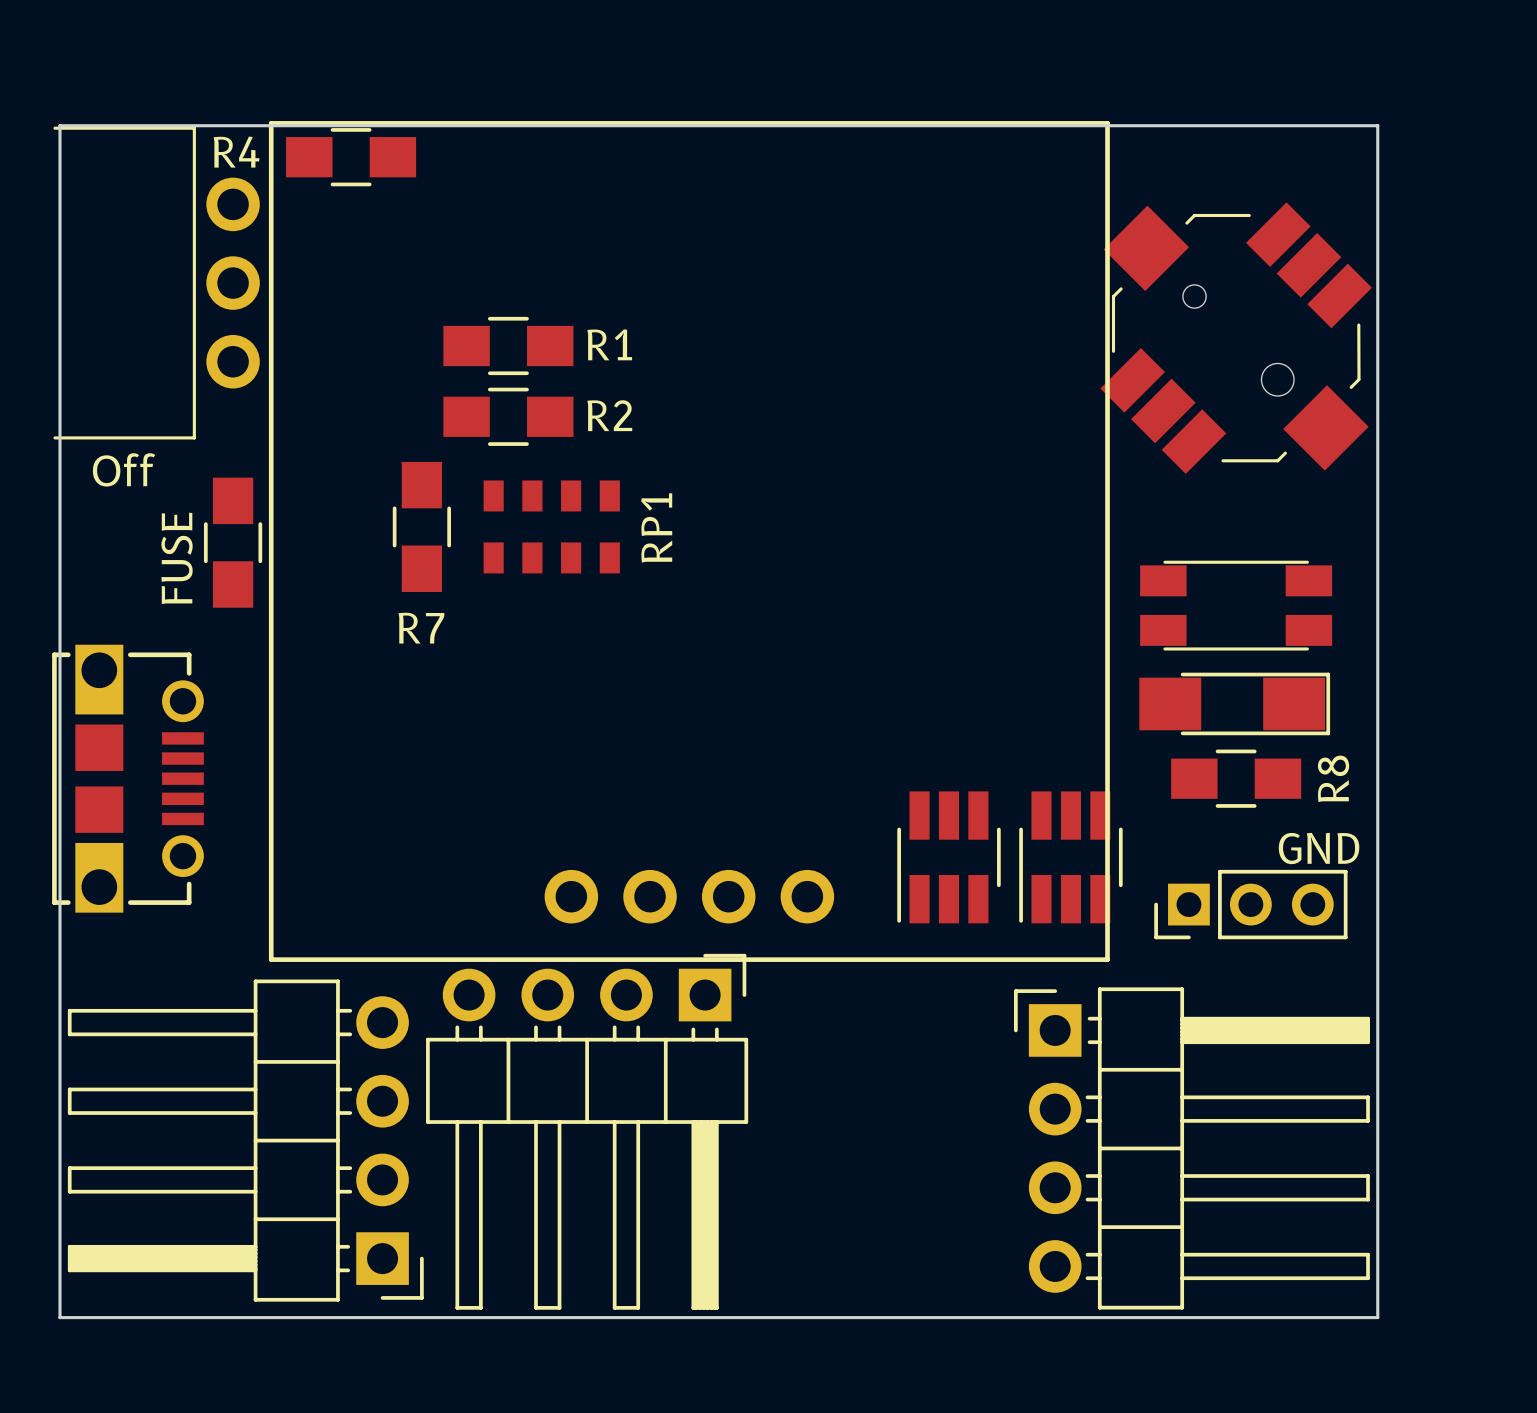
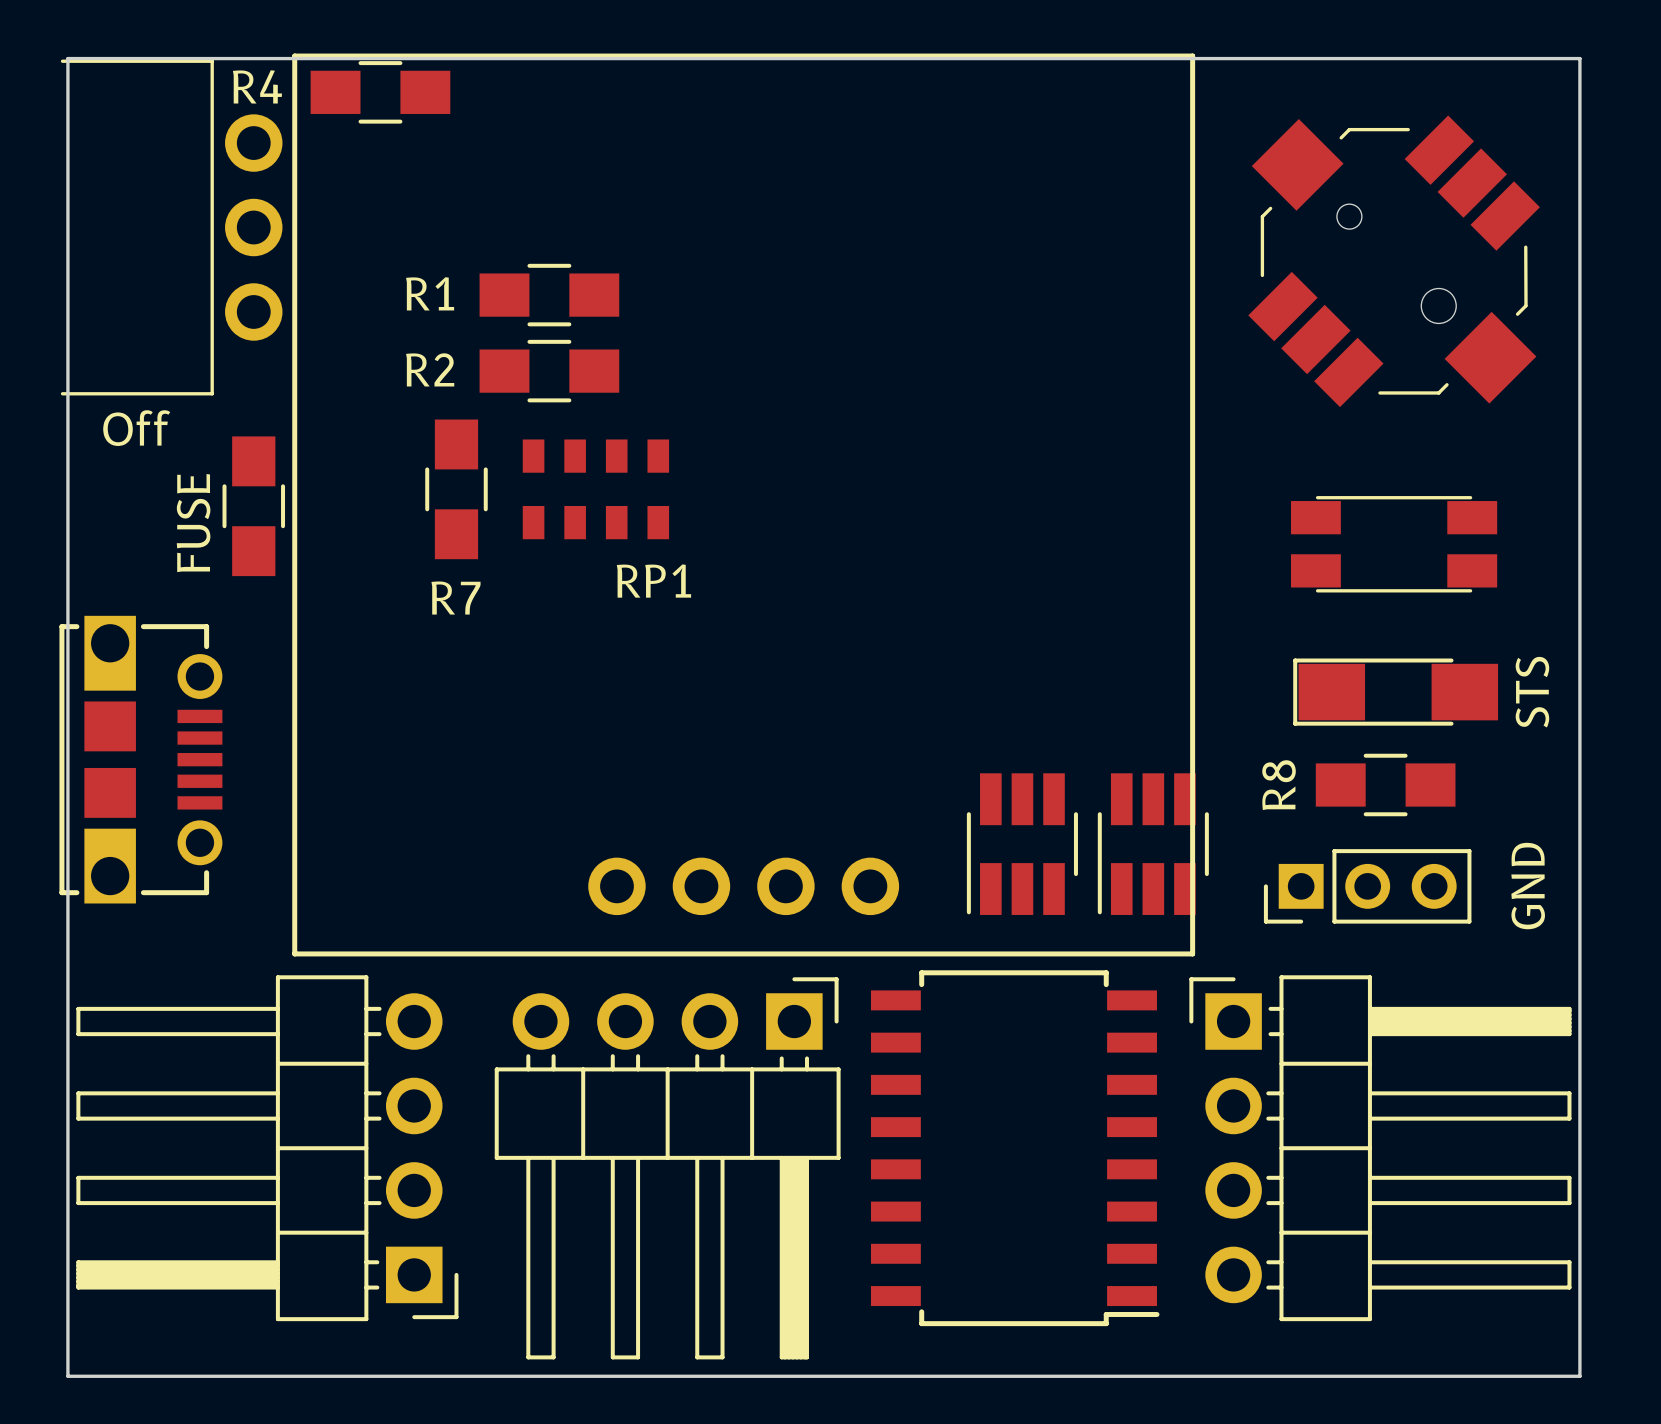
board edge: (1377, 125) (1377, 1317) (60, 1317) -> (1482, 58) (1579, 58) (1579, 1376) (67, 1376) (67, 1338)
part position: (1236, 338) -> (1394, 261)
R1 name position: R1 (609, 344) -> R1 (430, 293)
R2 name position: R2 (609, 415) -> R2 (430, 369)
RP1 name rotation: 0° (656, 527) -> 90° clockwise (653, 581)
part position: (1236, 605) -> (1394, 544)
part rotation: 0° (1234, 703) -> 180° (1395, 692)
text: none -> STS (1532, 692)
R8 position: (1236, 778) -> (1385, 785)
R8 name position: R8 (1333, 778) -> R8 (1279, 785)
text rotation: 0° (1319, 848) -> 90° counterclockwise (1528, 886)
part position: (1250, 904) -> (1367, 886)
part position: (587, 1131) -> (667, 1168)
part: none -> (1015, 1148)
part position: (1191, 1148) -> (1380, 1148)

